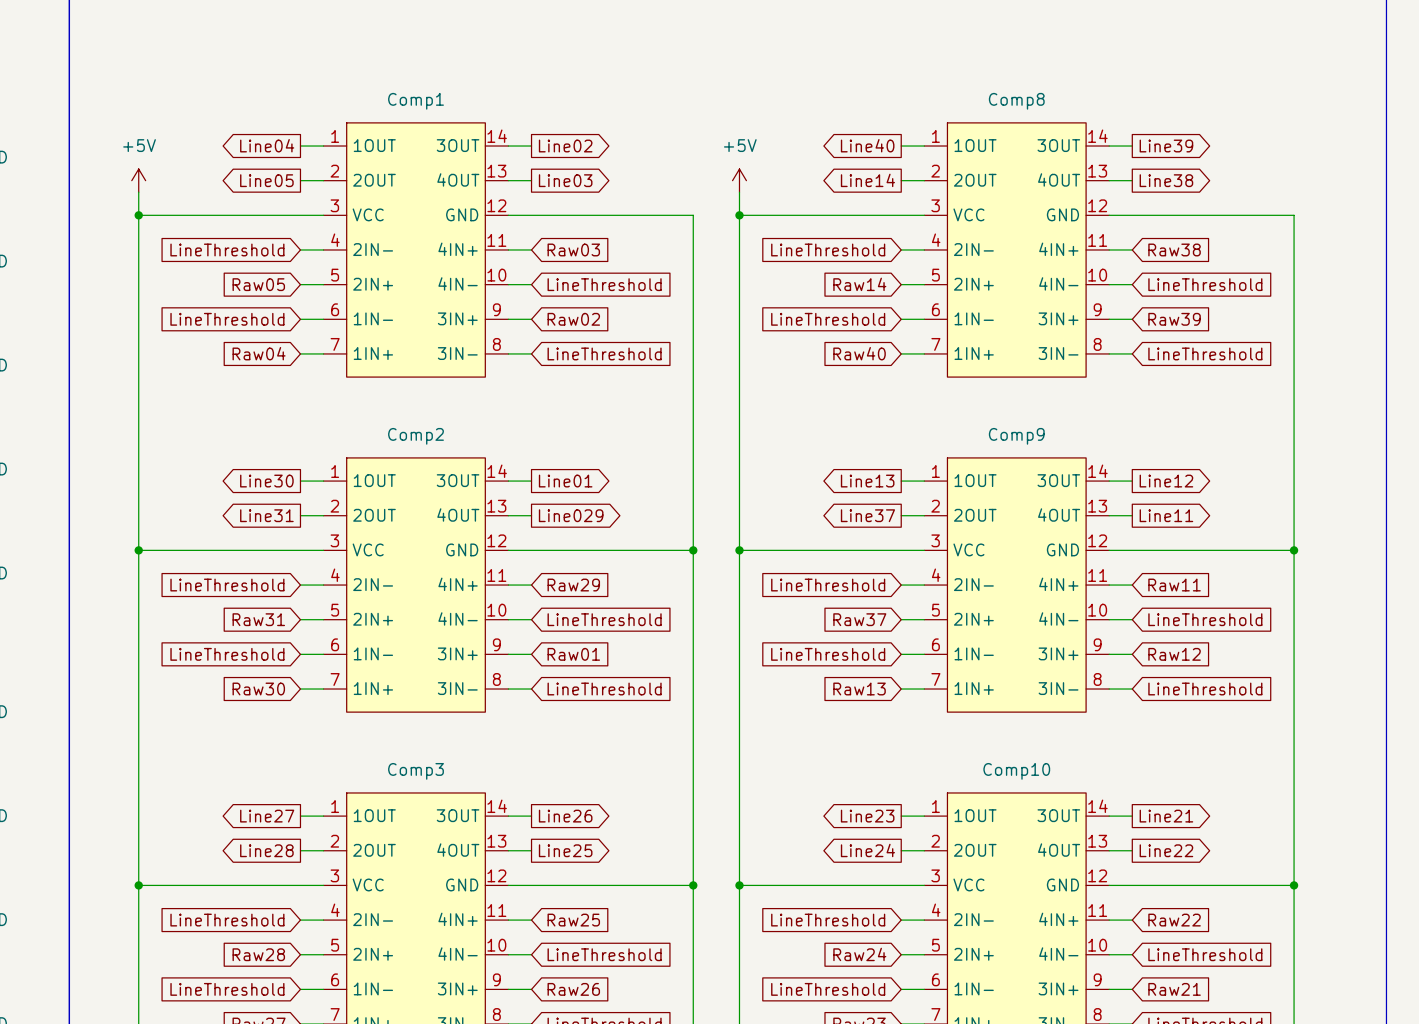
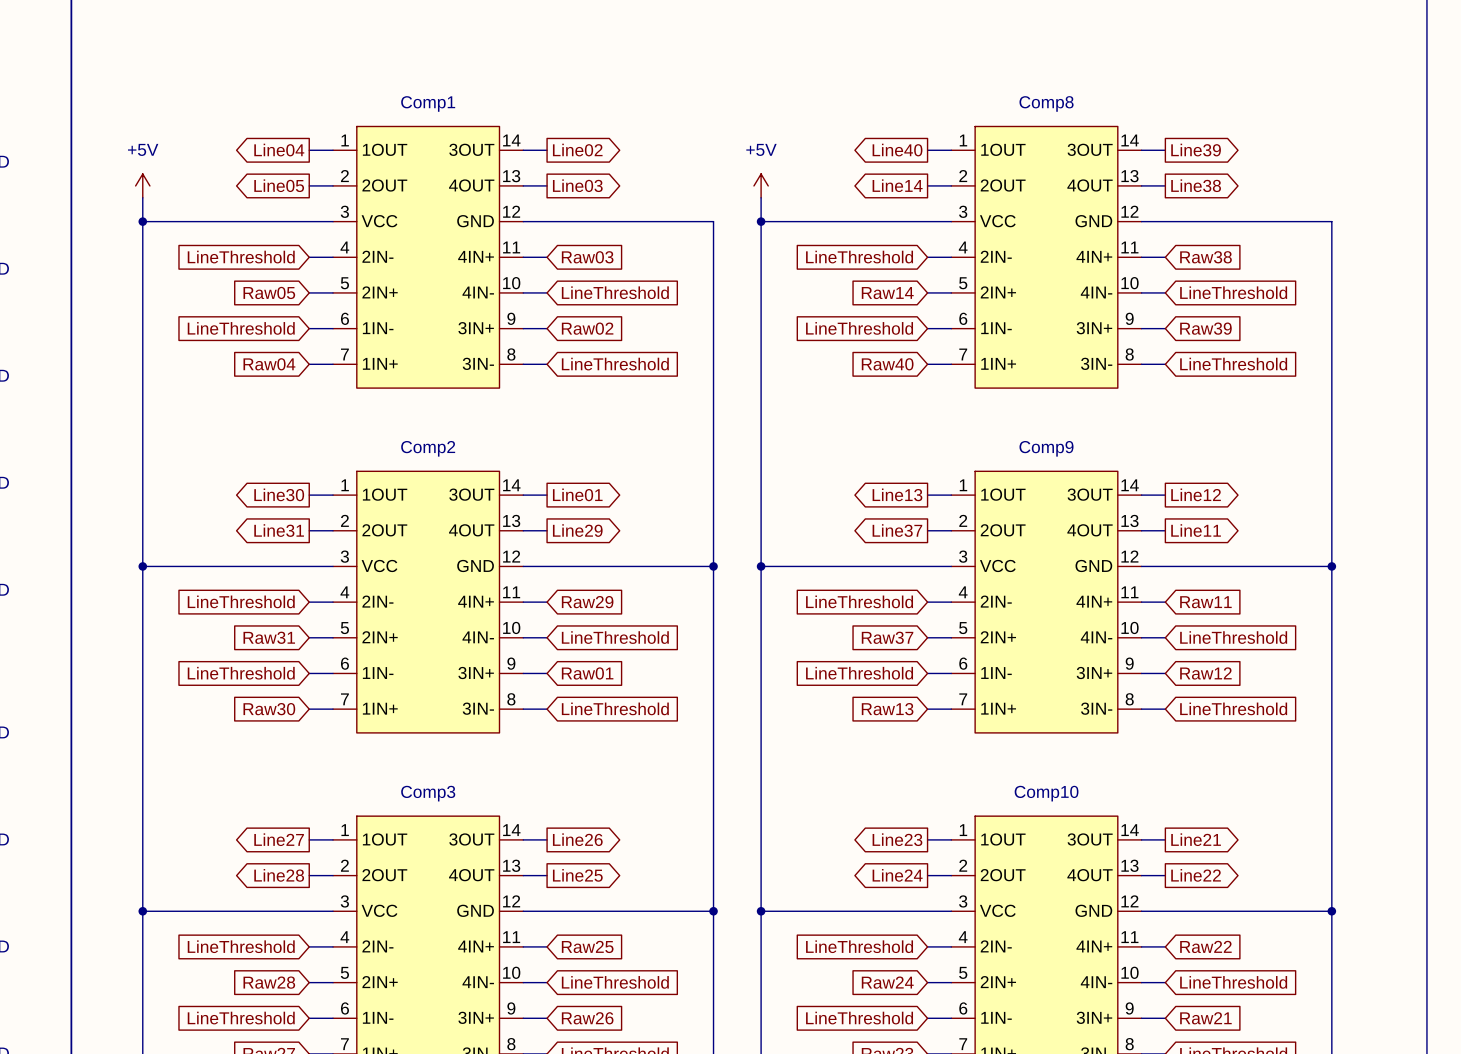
global label: Line029 (571, 515) -> Line29 (577, 530)

